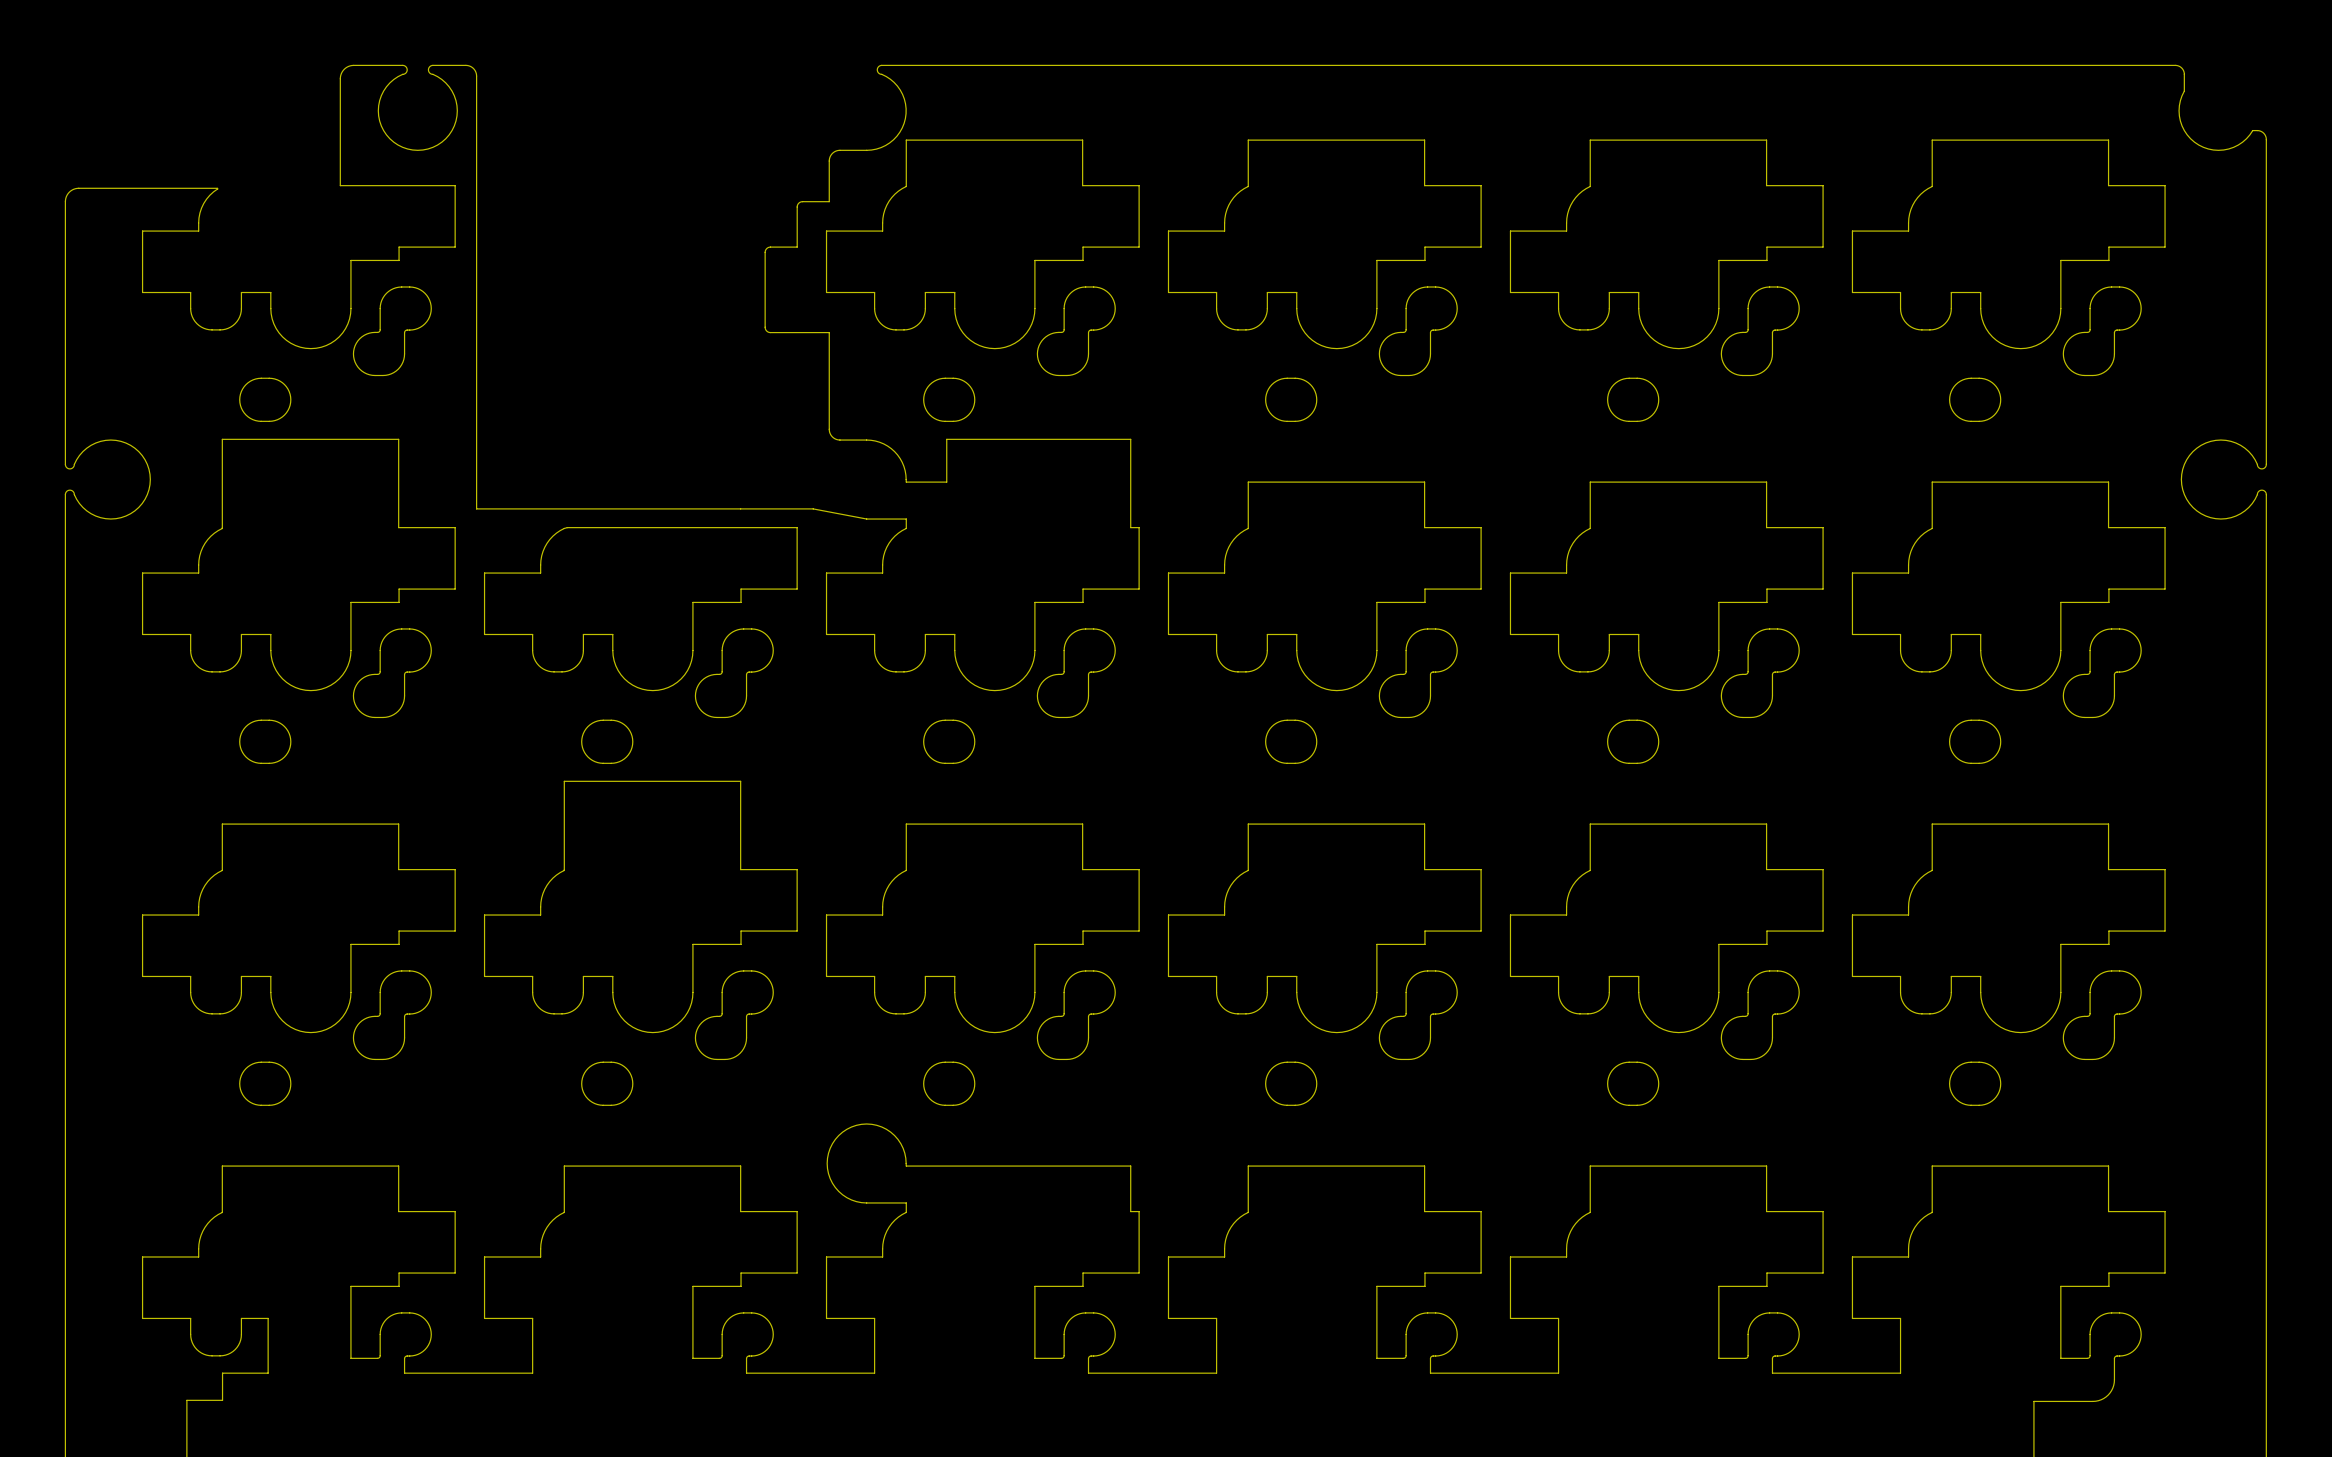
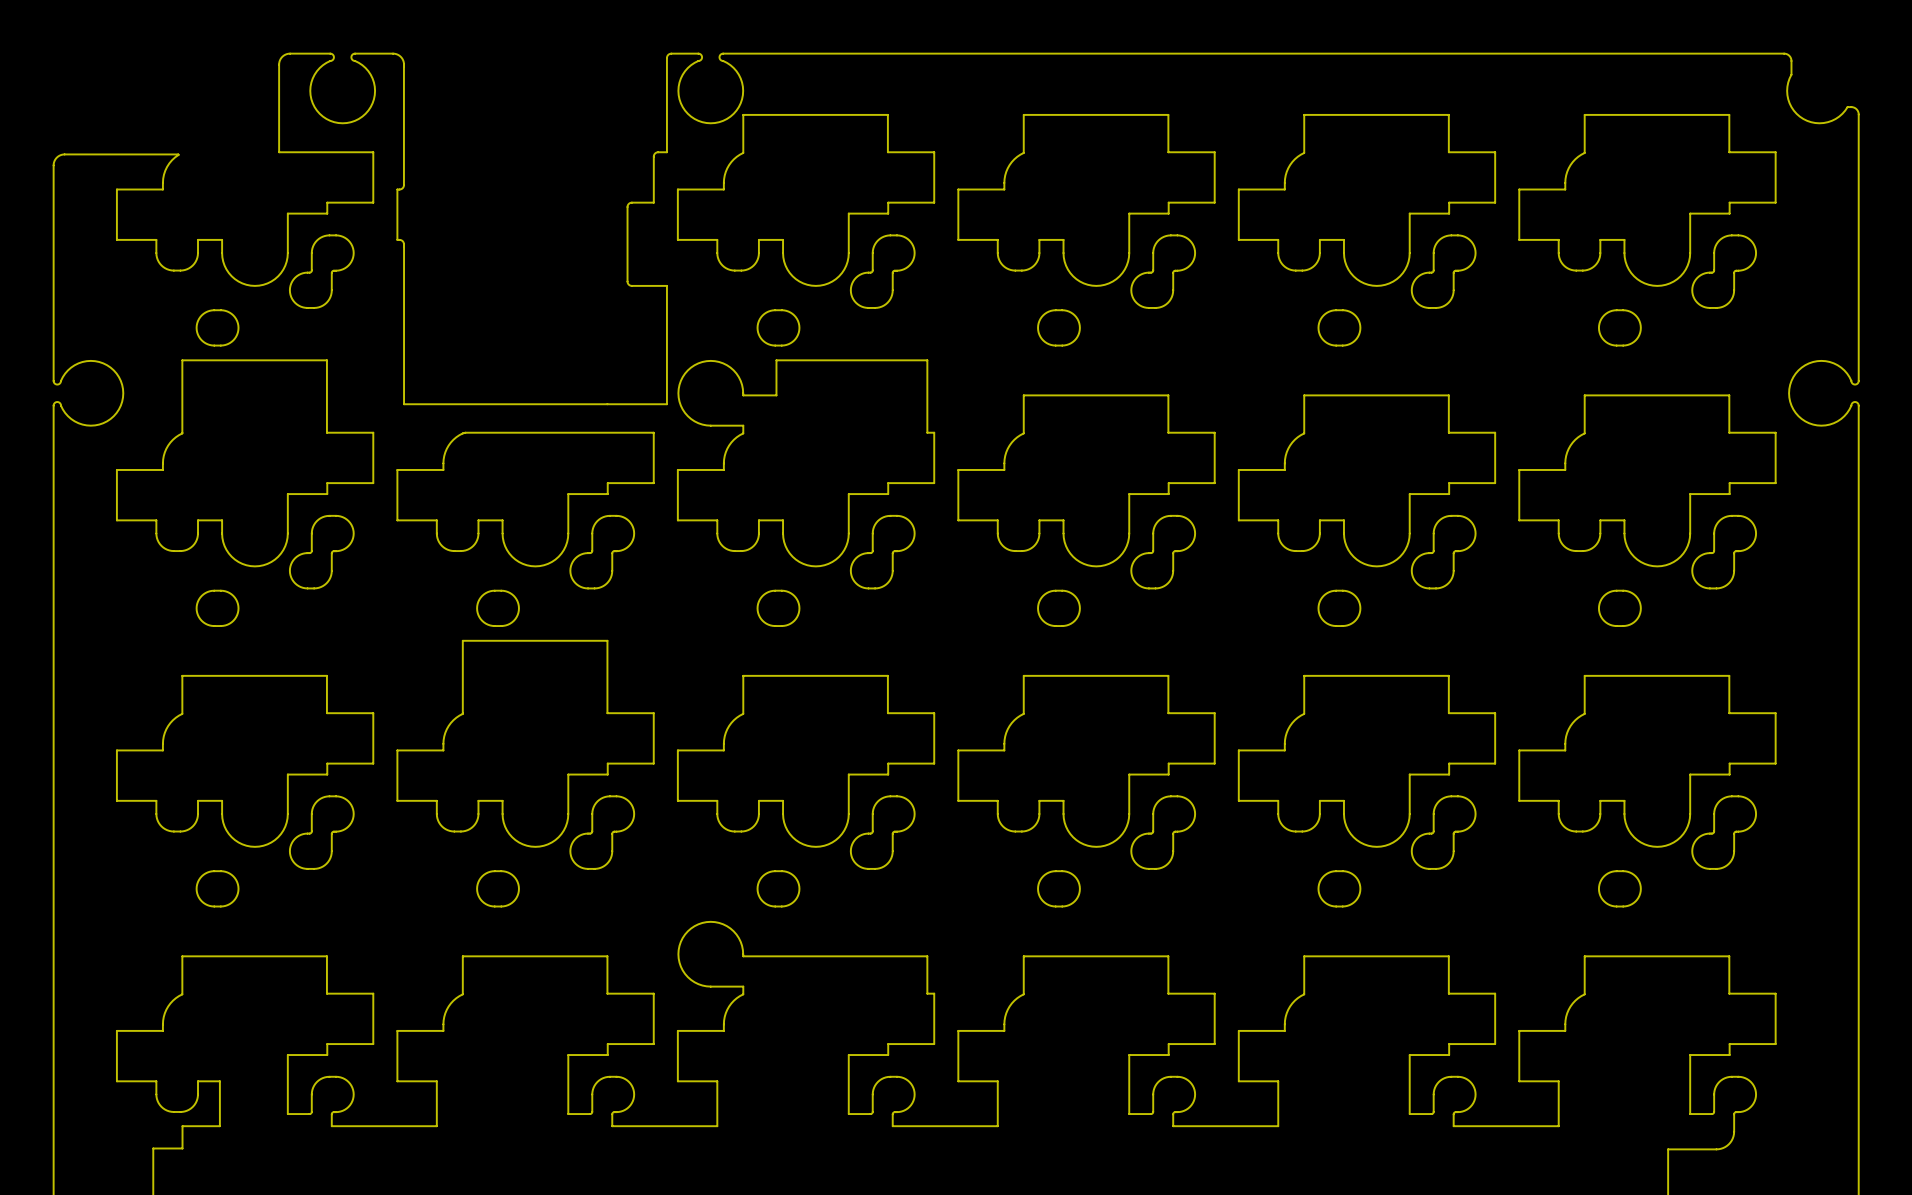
board edge: (465, 65) (473, 68) (476, 76) (476, 508) (813, 508) (866, 519) -> (382, 53) (398, 55) (404, 64) (403, 185) (401, 188) (397, 189) (397, 239) (401, 240) (403, 244) (404, 404) (666, 404) (666, 285) (630, 285) (627, 282) (627, 268)
board edge: (881, 74) (897, 86) (904, 99) (905, 118) (899, 132) (889, 142) (876, 149) (838, 150) (833, 152) (829, 159) (829, 201) (801, 201) (797, 207) -> (723, 60) (733, 67) (740, 78) (742, 86) (742, 99) (736, 110) (730, 116) (719, 122) (706, 123) (694, 118) (687, 113) (680, 103) (678, 95) (678, 86) (682, 74) (691, 65) (700, 59) (701, 55) (698, 53) (671, 53) (667, 55) (666, 152) (654, 153) (653, 169)
board edge: (765, 327) (769, 332) (829, 332) (830, 434) (837, 439) (871, 440) (887, 446) (902, 462) (906, 479) -> (710, 425) (694, 421) (685, 413) (680, 405) (678, 397) (679, 384) (687, 370) (702, 361) (710, 360) (723, 363) (736, 373) (740, 380) (743, 393)

